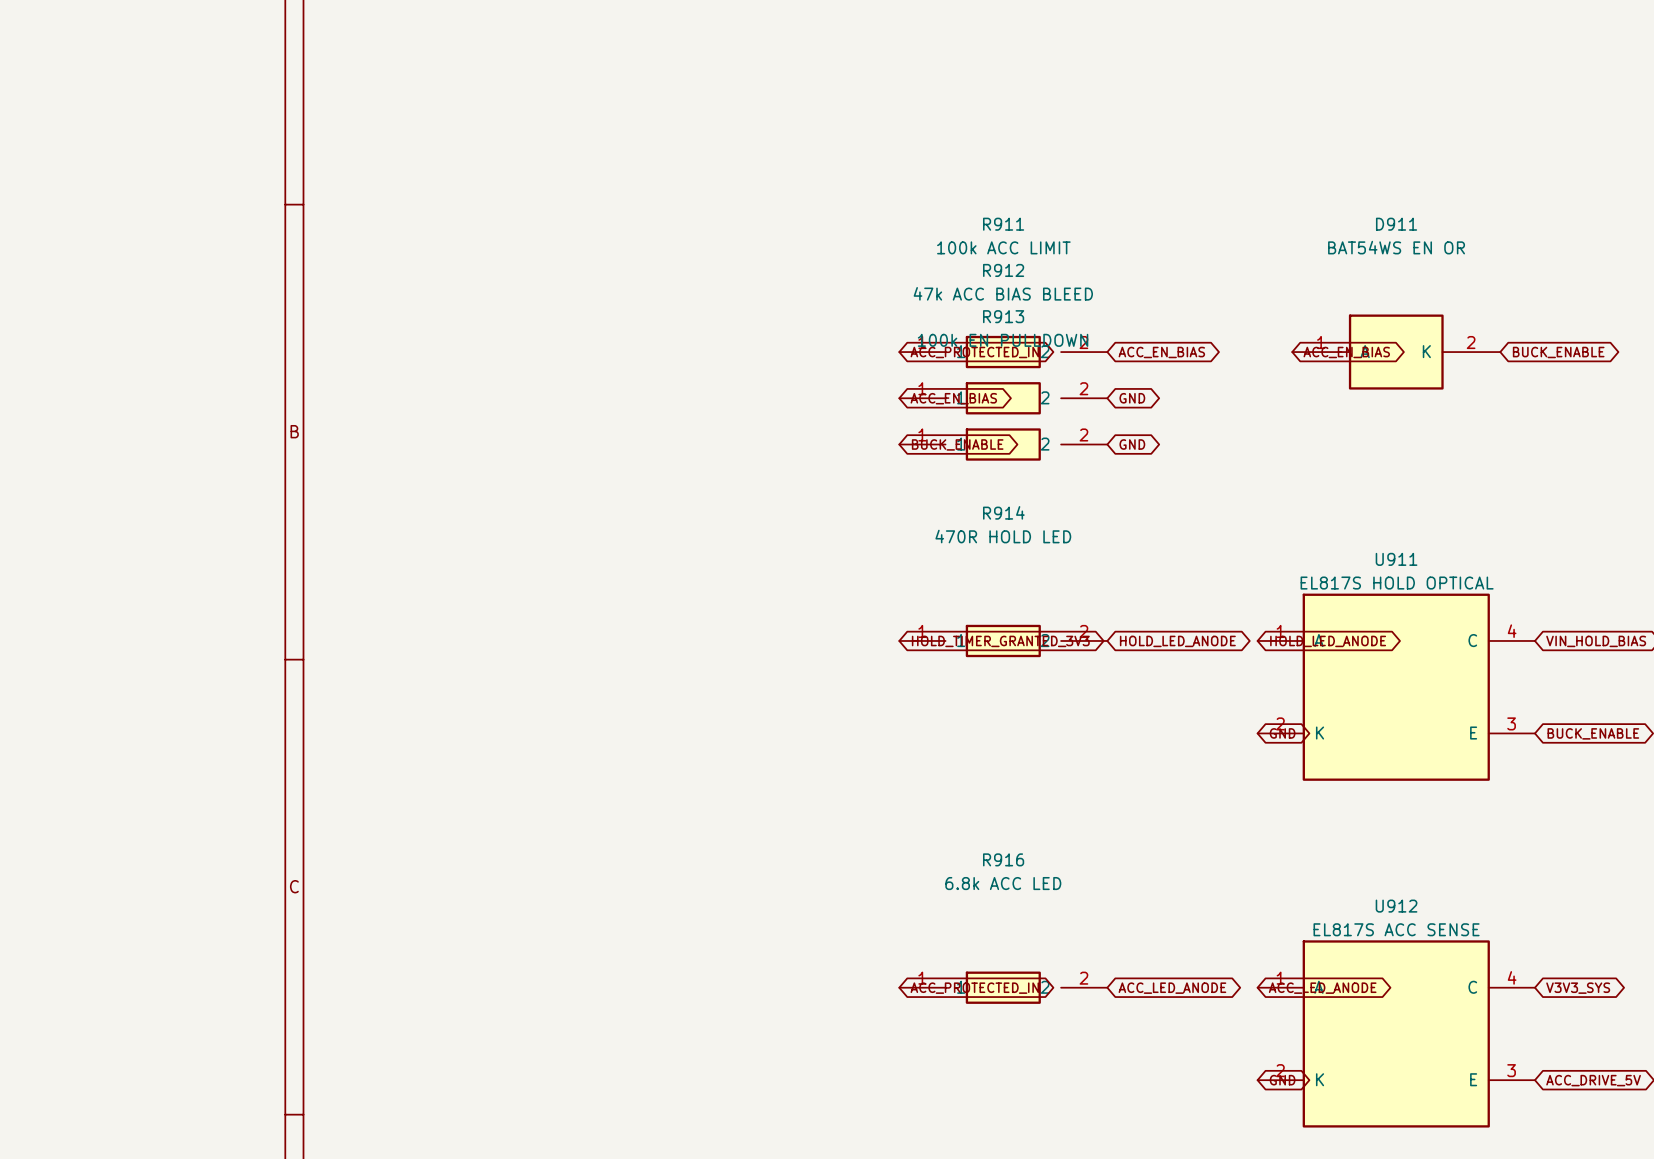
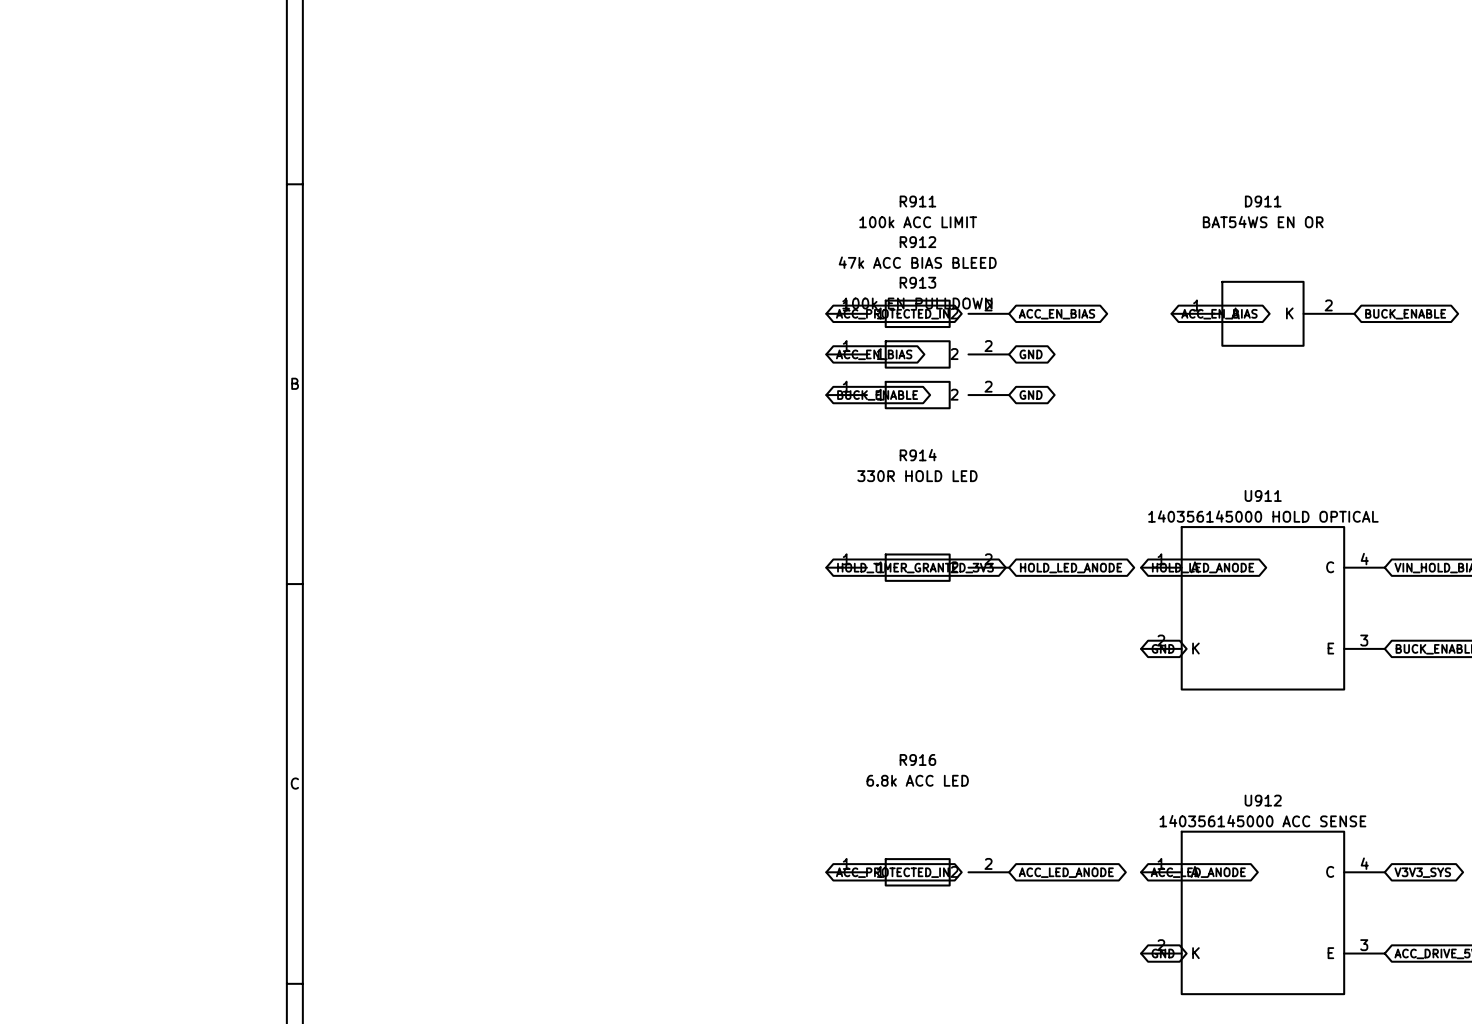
R914 value: 470R HOLD LED (1003, 536) -> 330R HOLD LED (917, 476)
U911 value: EL817S HOLD OPTICAL (1397, 583) -> 140356145000 HOLD OPTICAL (1263, 516)
U912 value: EL817S ACC SENSE (1396, 929) -> 140356145000 ACC SENSE (1262, 821)

